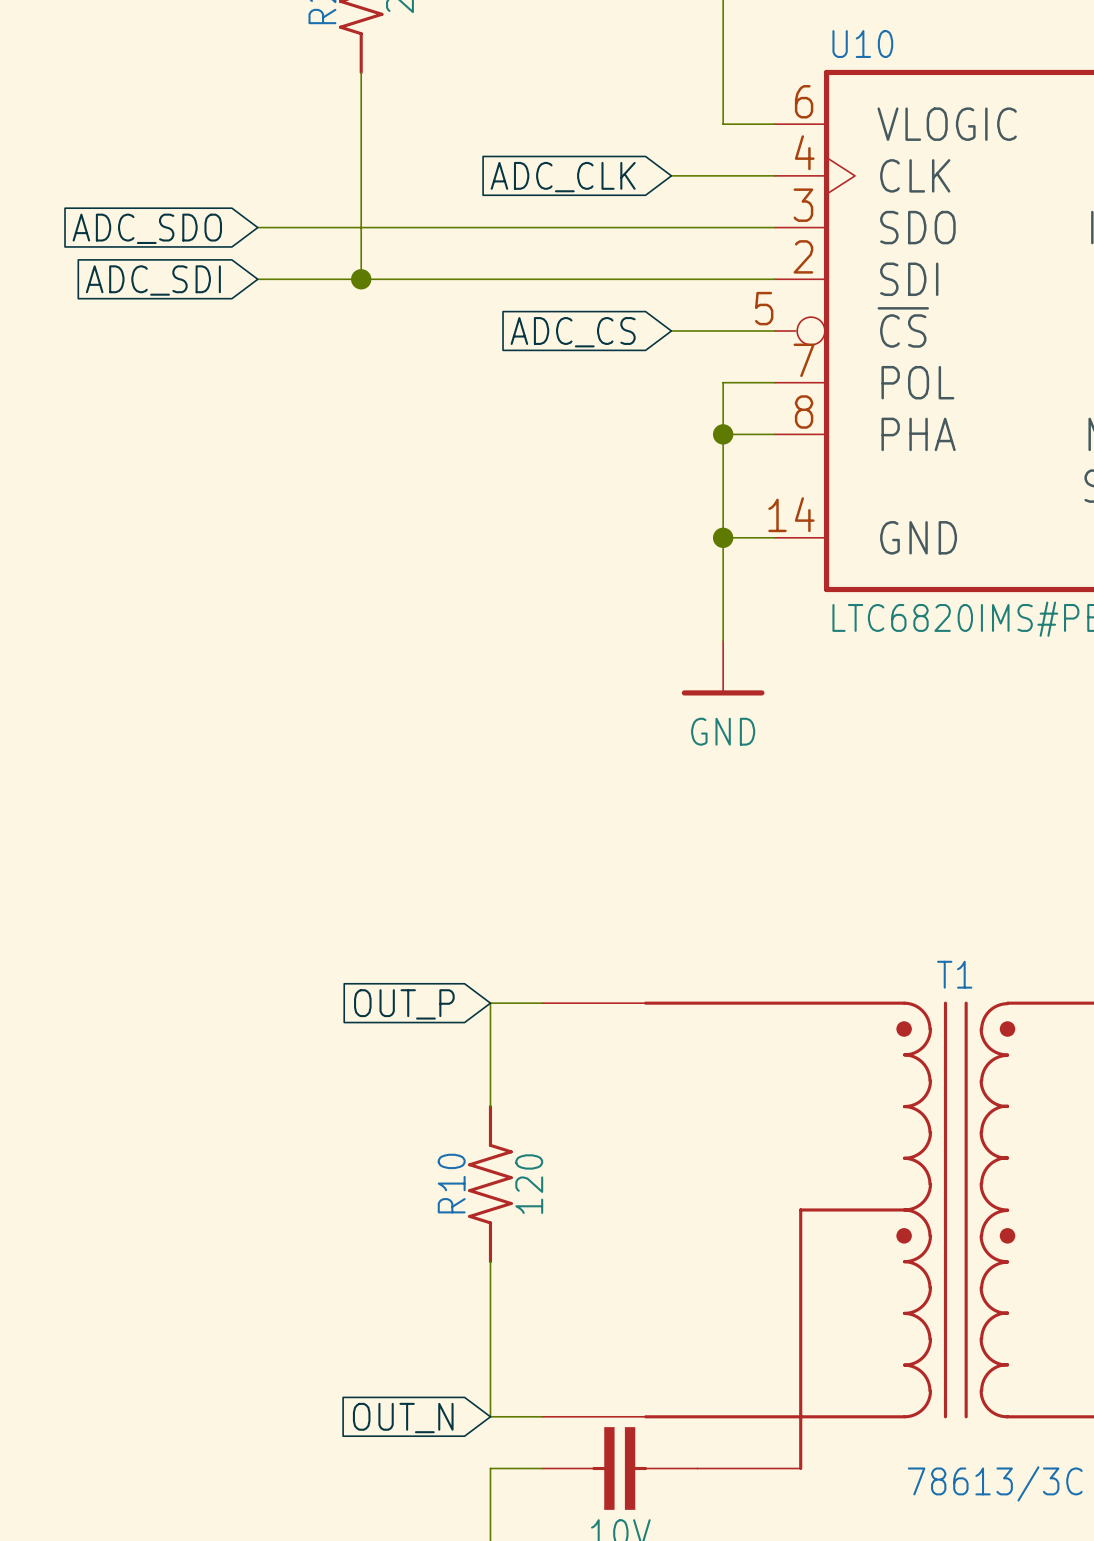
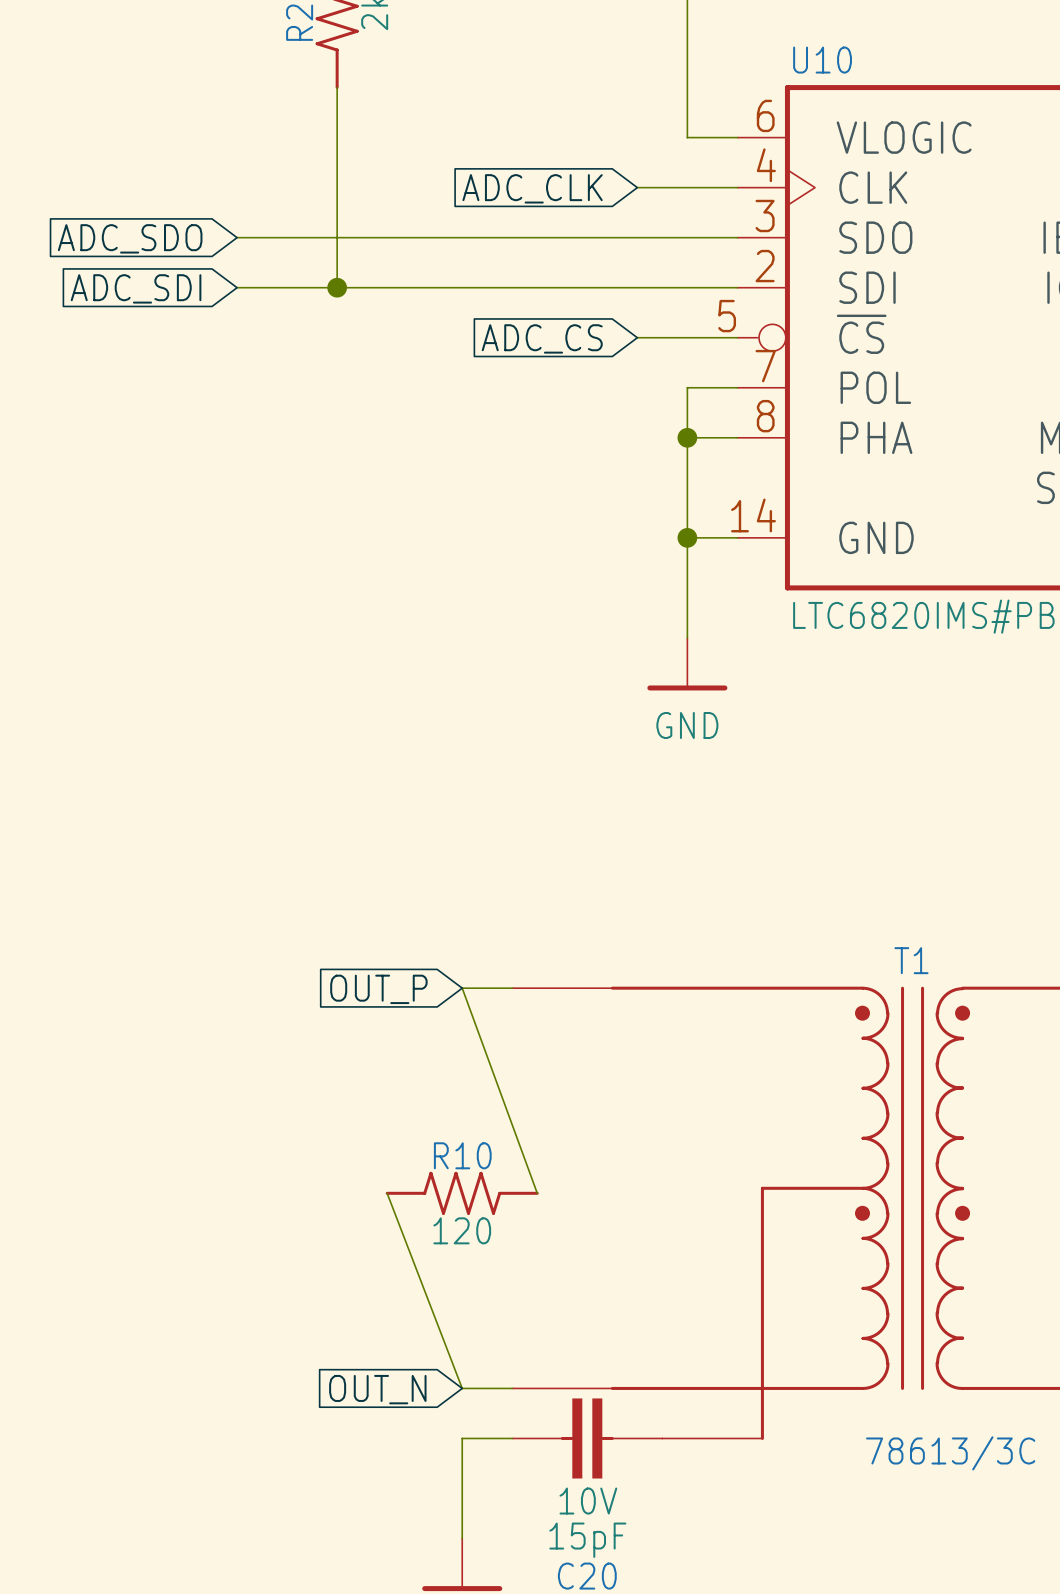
wire: (490, 1003) (490, 1106) -> (462, 988) (537, 1193)
R10 rotation: 0° (490, 1184) -> 90° clockwise (462, 1193)
wire: (490, 1261) (490, 1416) -> (387, 1193) (462, 1388)

